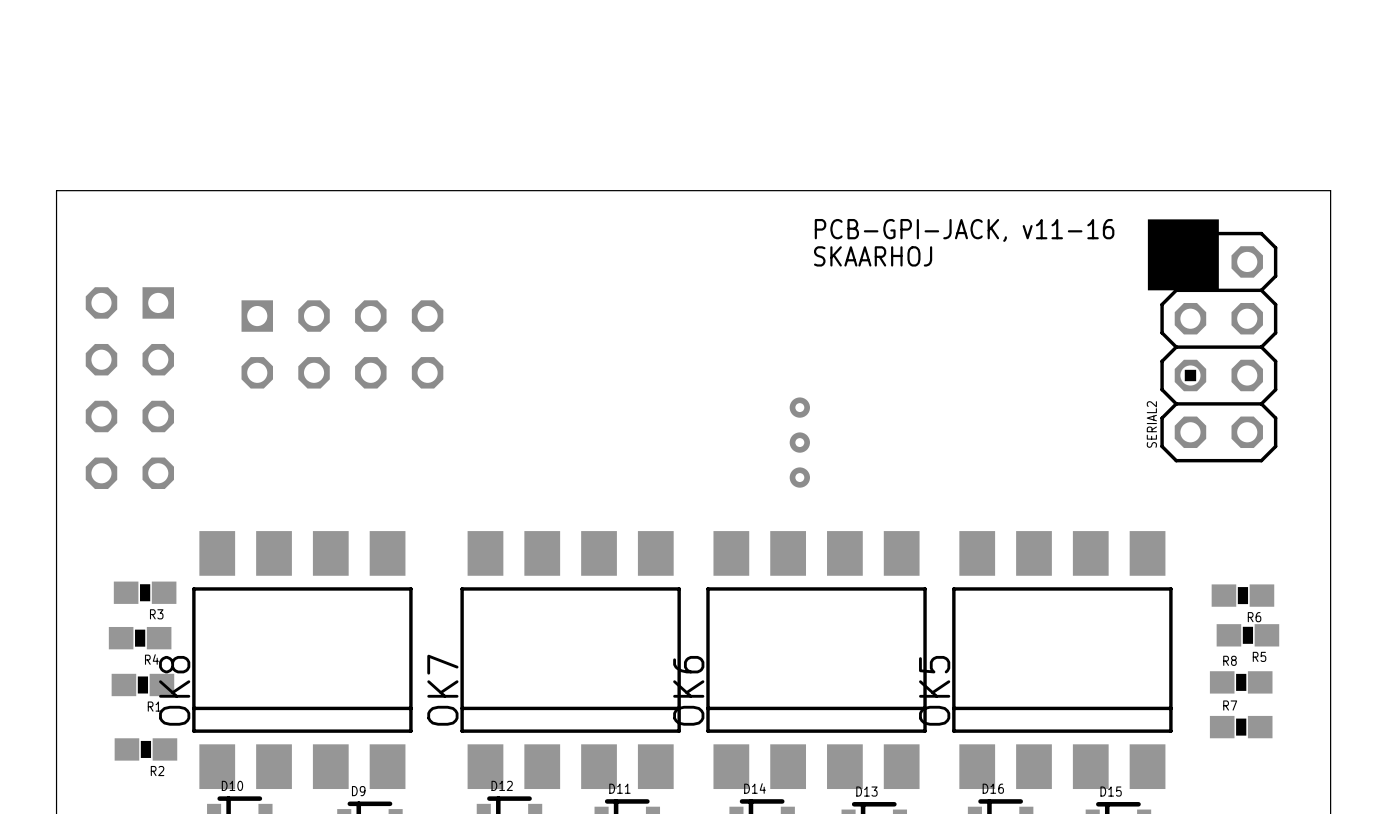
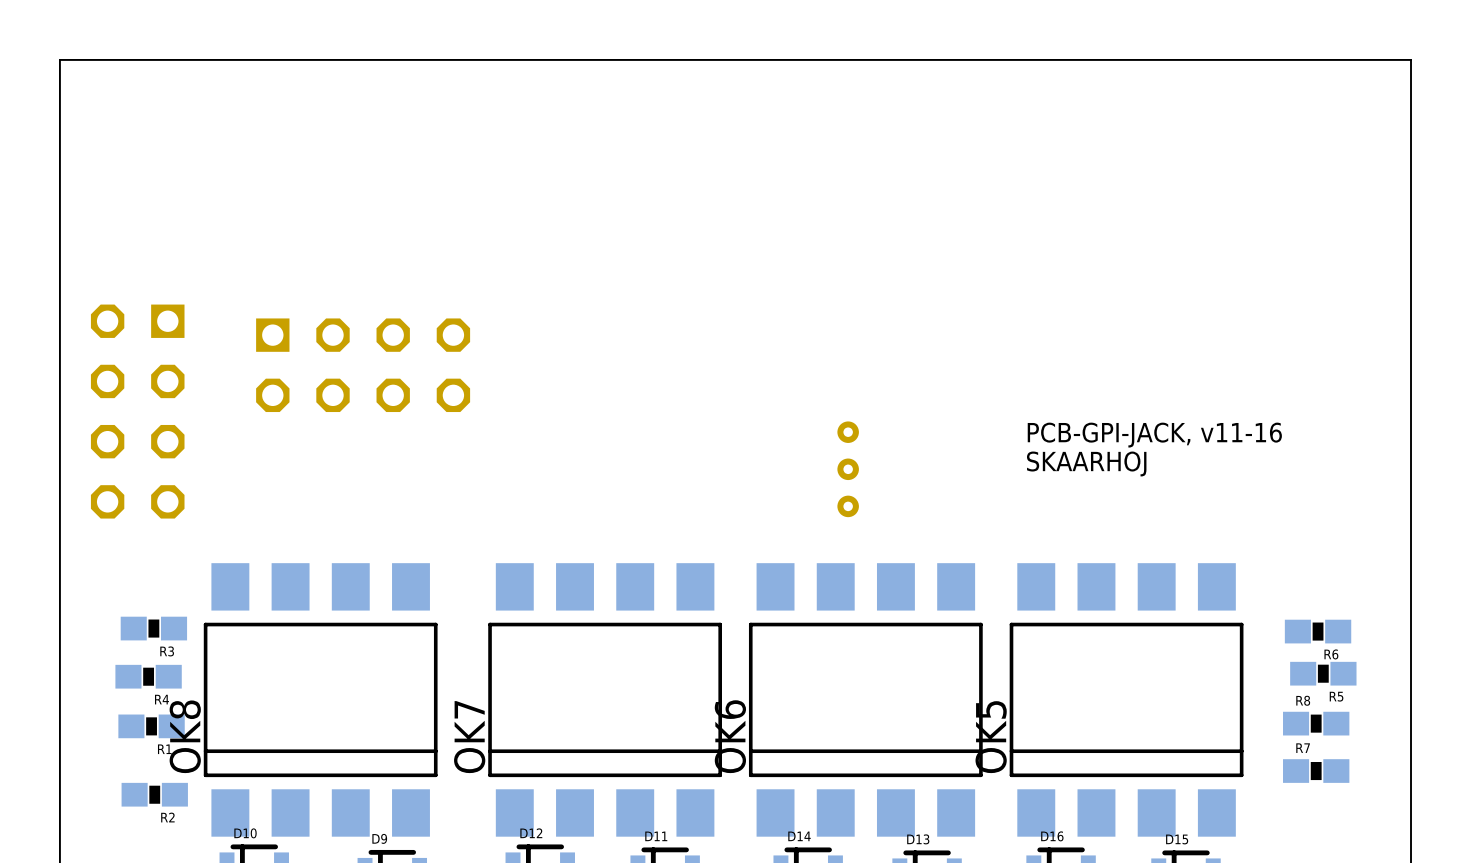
board edge: (1330, 190) (56, 190) -> (1411, 202) (1411, 59) (59, 59) (59, 202)
text position: PCB-GPI-JACK, v11-16 (964, 230) -> PCB-GPI-JACK, v11-16 (1154, 435)
text position: SKAARHOJ (873, 256) -> SKAARHOJ (1086, 463)
SERIAL2: (1212, 340) -> none

